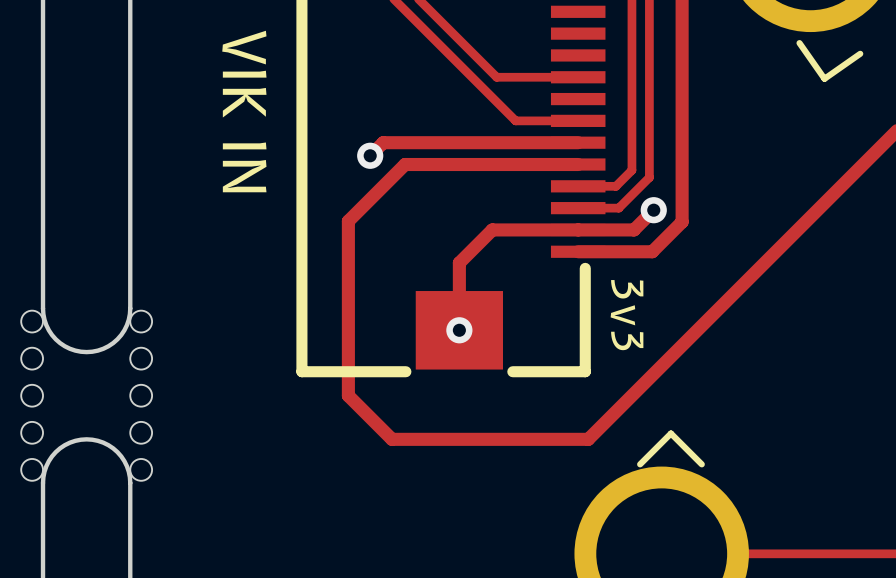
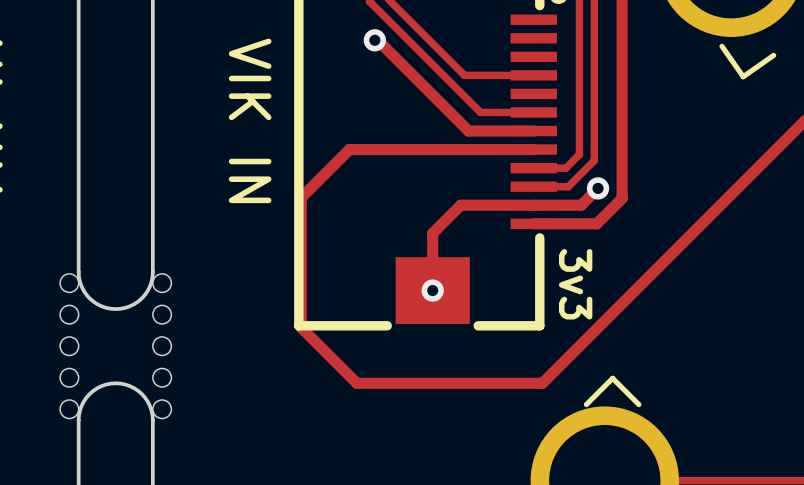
track: (501, 142) (383, 142) (370, 155) -> (468, 131) (377, 40) (374, 40)
via position: (370, 155) -> (374, 40)
track: (405, 164) (348, 221) (348, 395) (392, 439) -> (386, 149) (349, 149) (301, 197) (301, 327) (356, 383) (375, 383)

